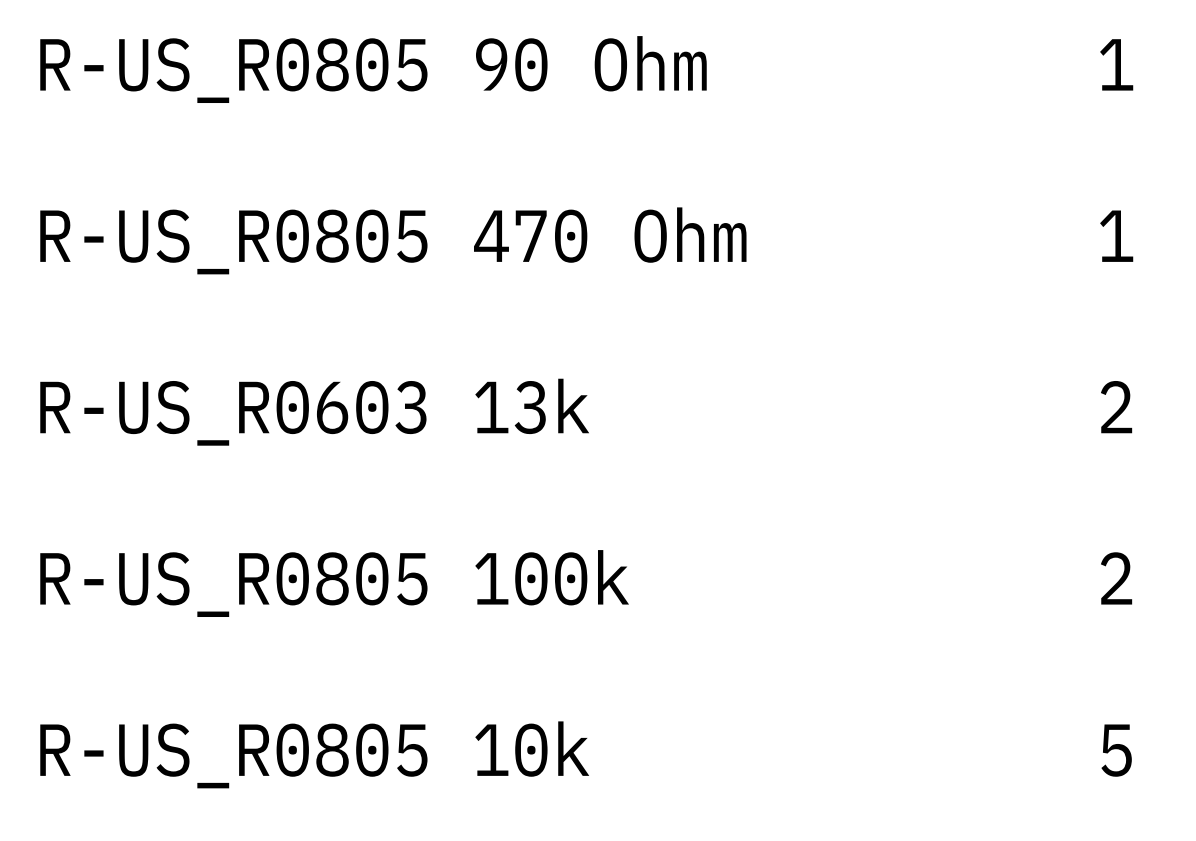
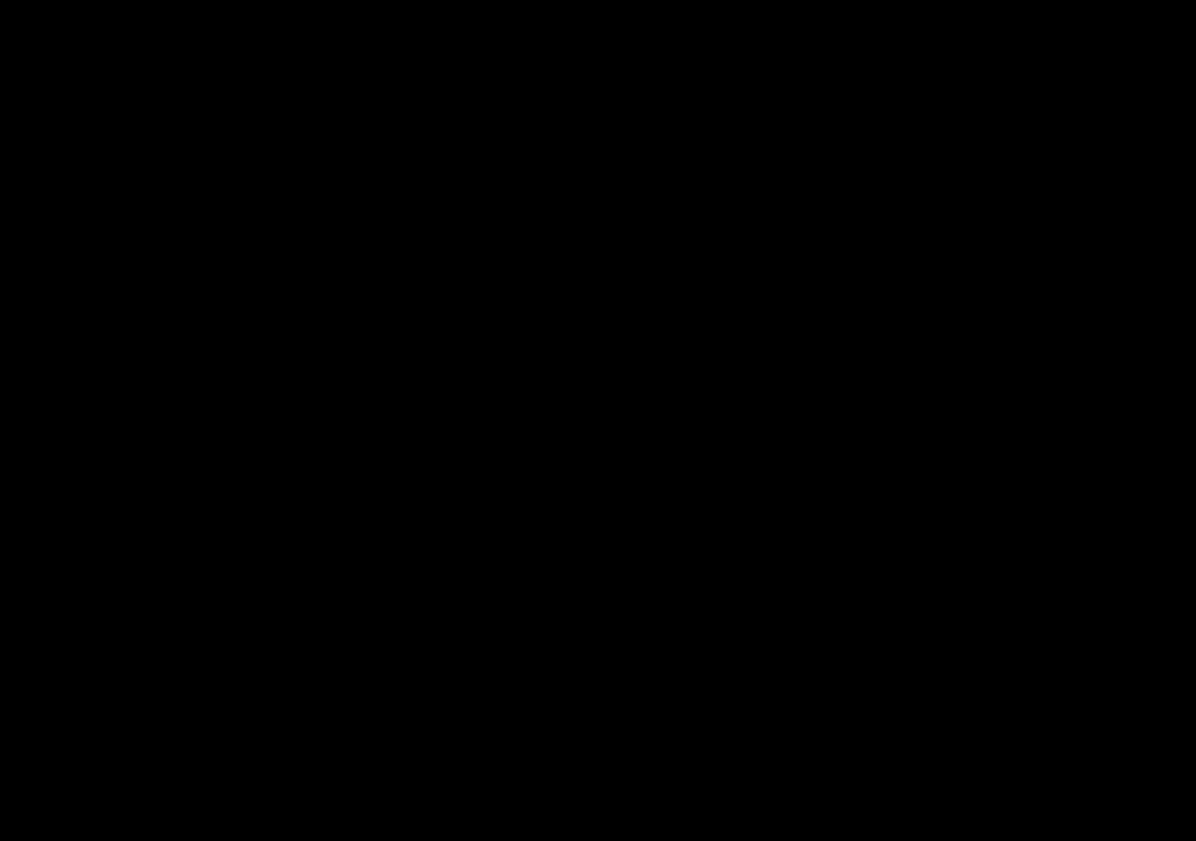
text: 1 (1116, 64) -> none
text: R-US_R0805 90 Ohm (373, 69) -> none
text: 1 (1116, 236) -> none
text: R-US_R0805 470 Ohm (393, 240) -> none
text: 2 (1116, 407) -> none
text: R-US_R0603 13k (314, 412) -> none
text: 2 (1116, 578) -> none
text: R-US_R0805 100k (334, 583) -> none
text: 5 (1116, 750) -> none
text: R-US_R0805 10k (314, 754) -> none

